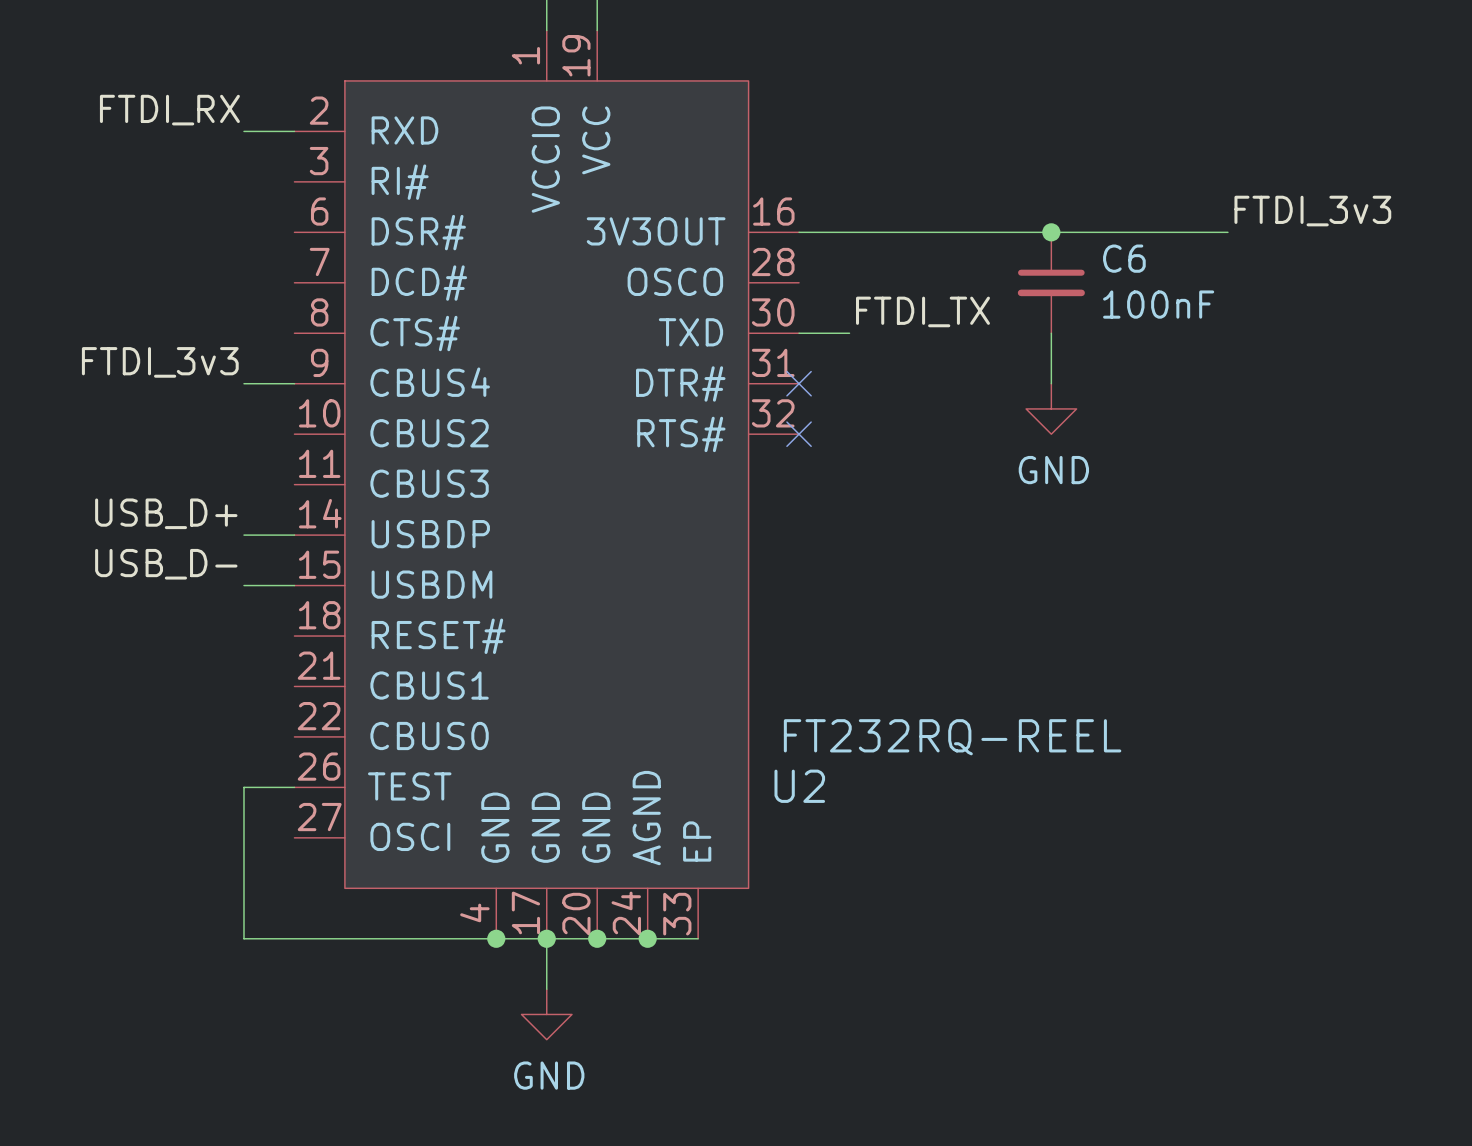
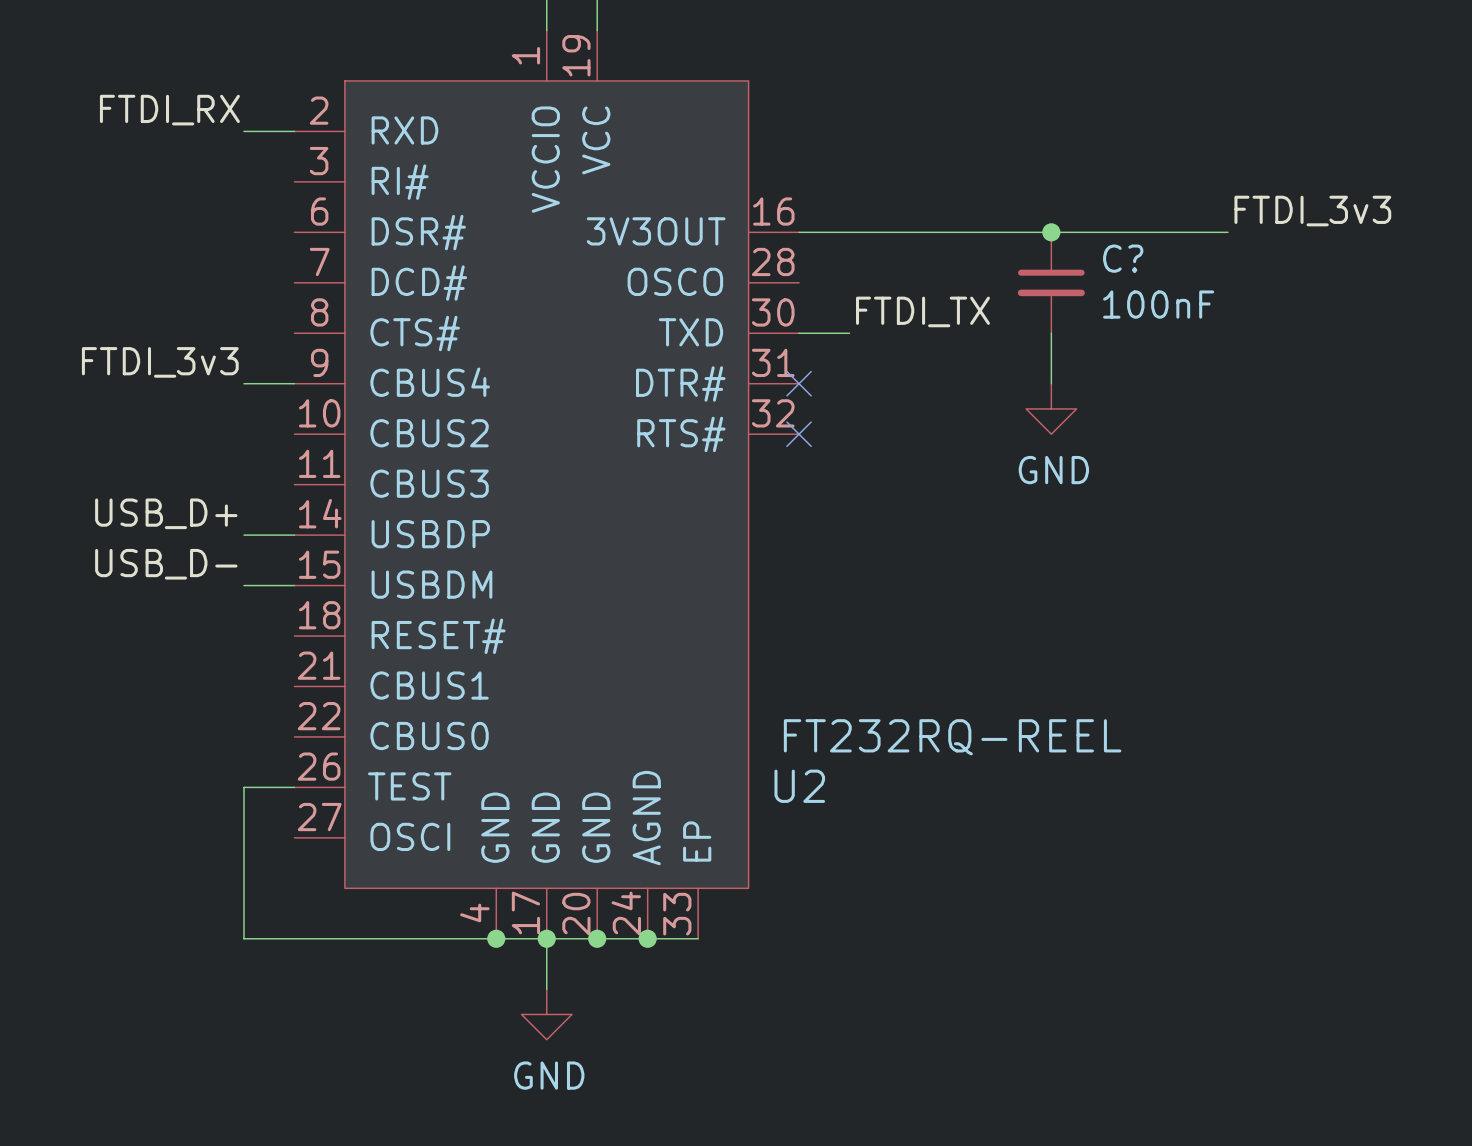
C6 name: C6 (1124, 258) -> C? (1123, 258)

